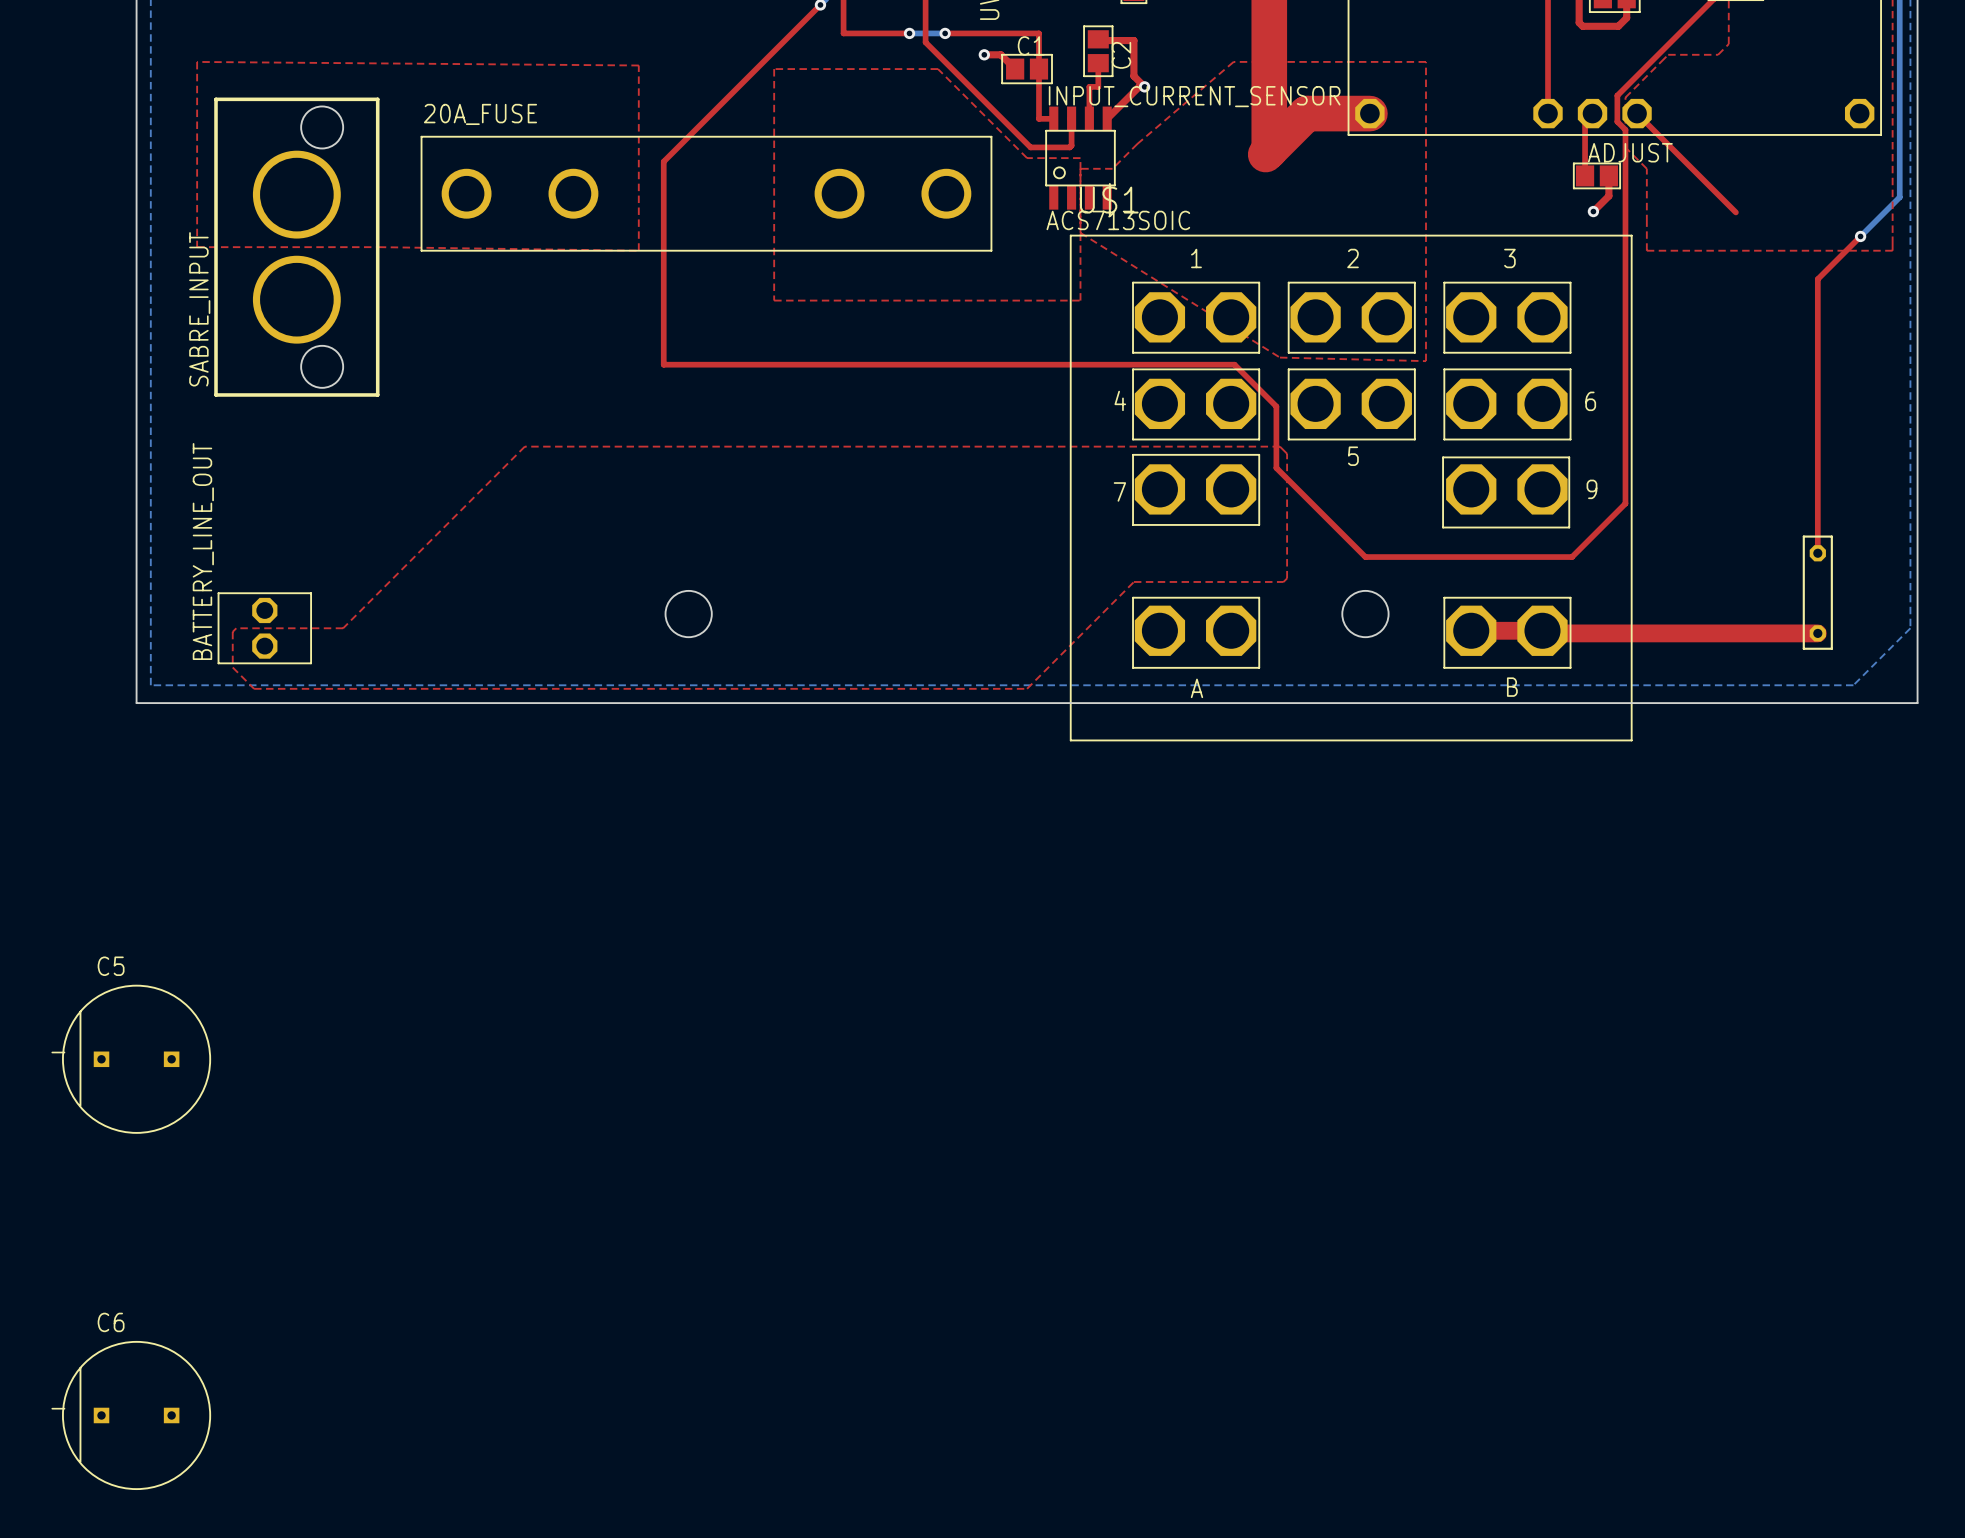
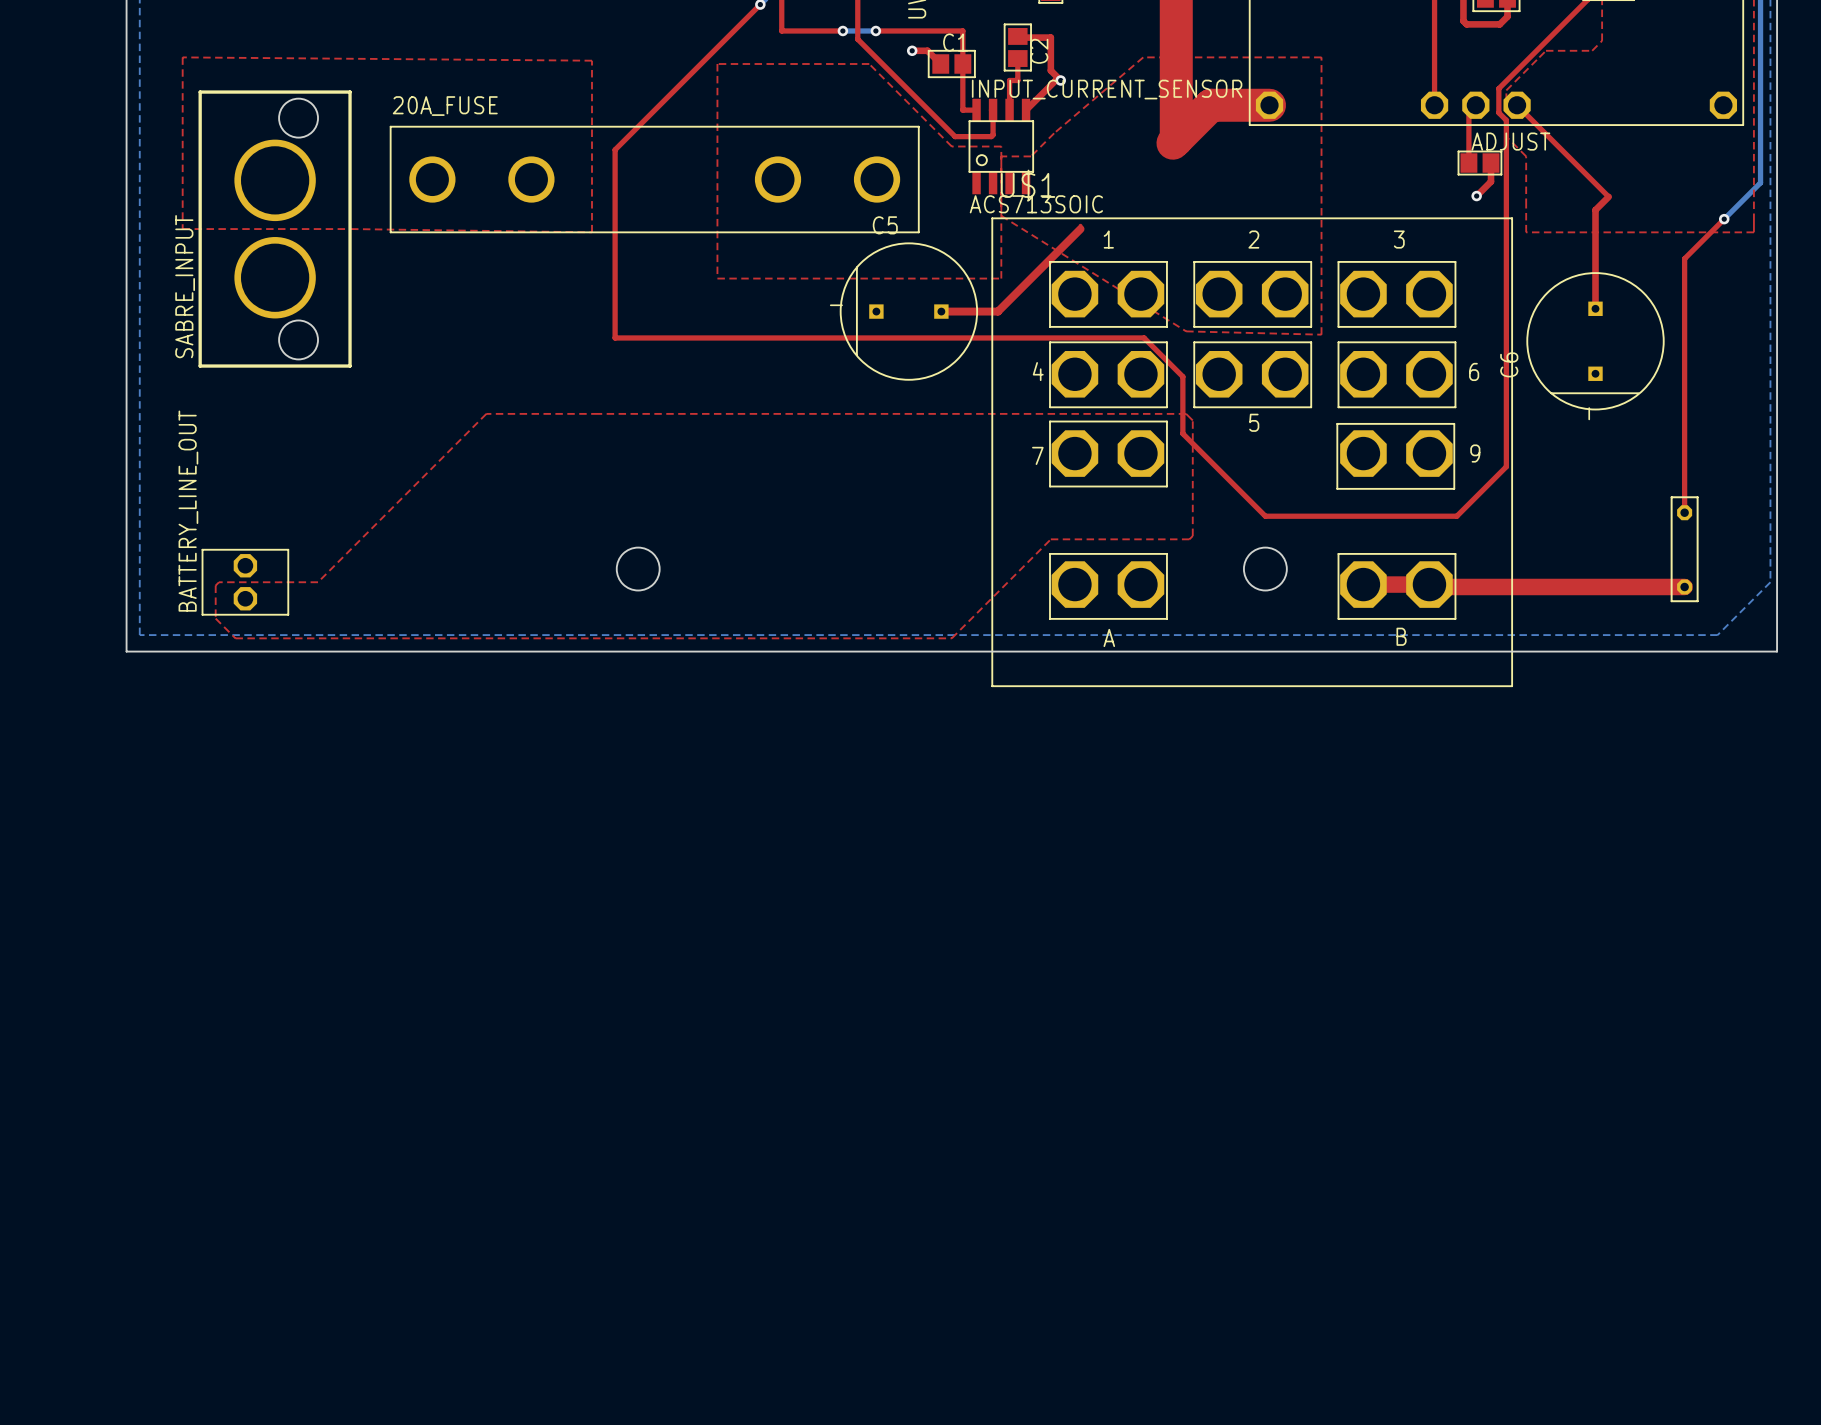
top track: none -> (1608, 196) (1595, 210) (1595, 308)
top track: none -> (1080, 225) (1080, 229) (998, 311) (941, 311)
C5 position: (136, 1059) -> (908, 311)
C6 rotation: 0° (136, 1415) -> 90° counterclockwise (1595, 341)
C6 position: (136, 1415) -> (1595, 341)

